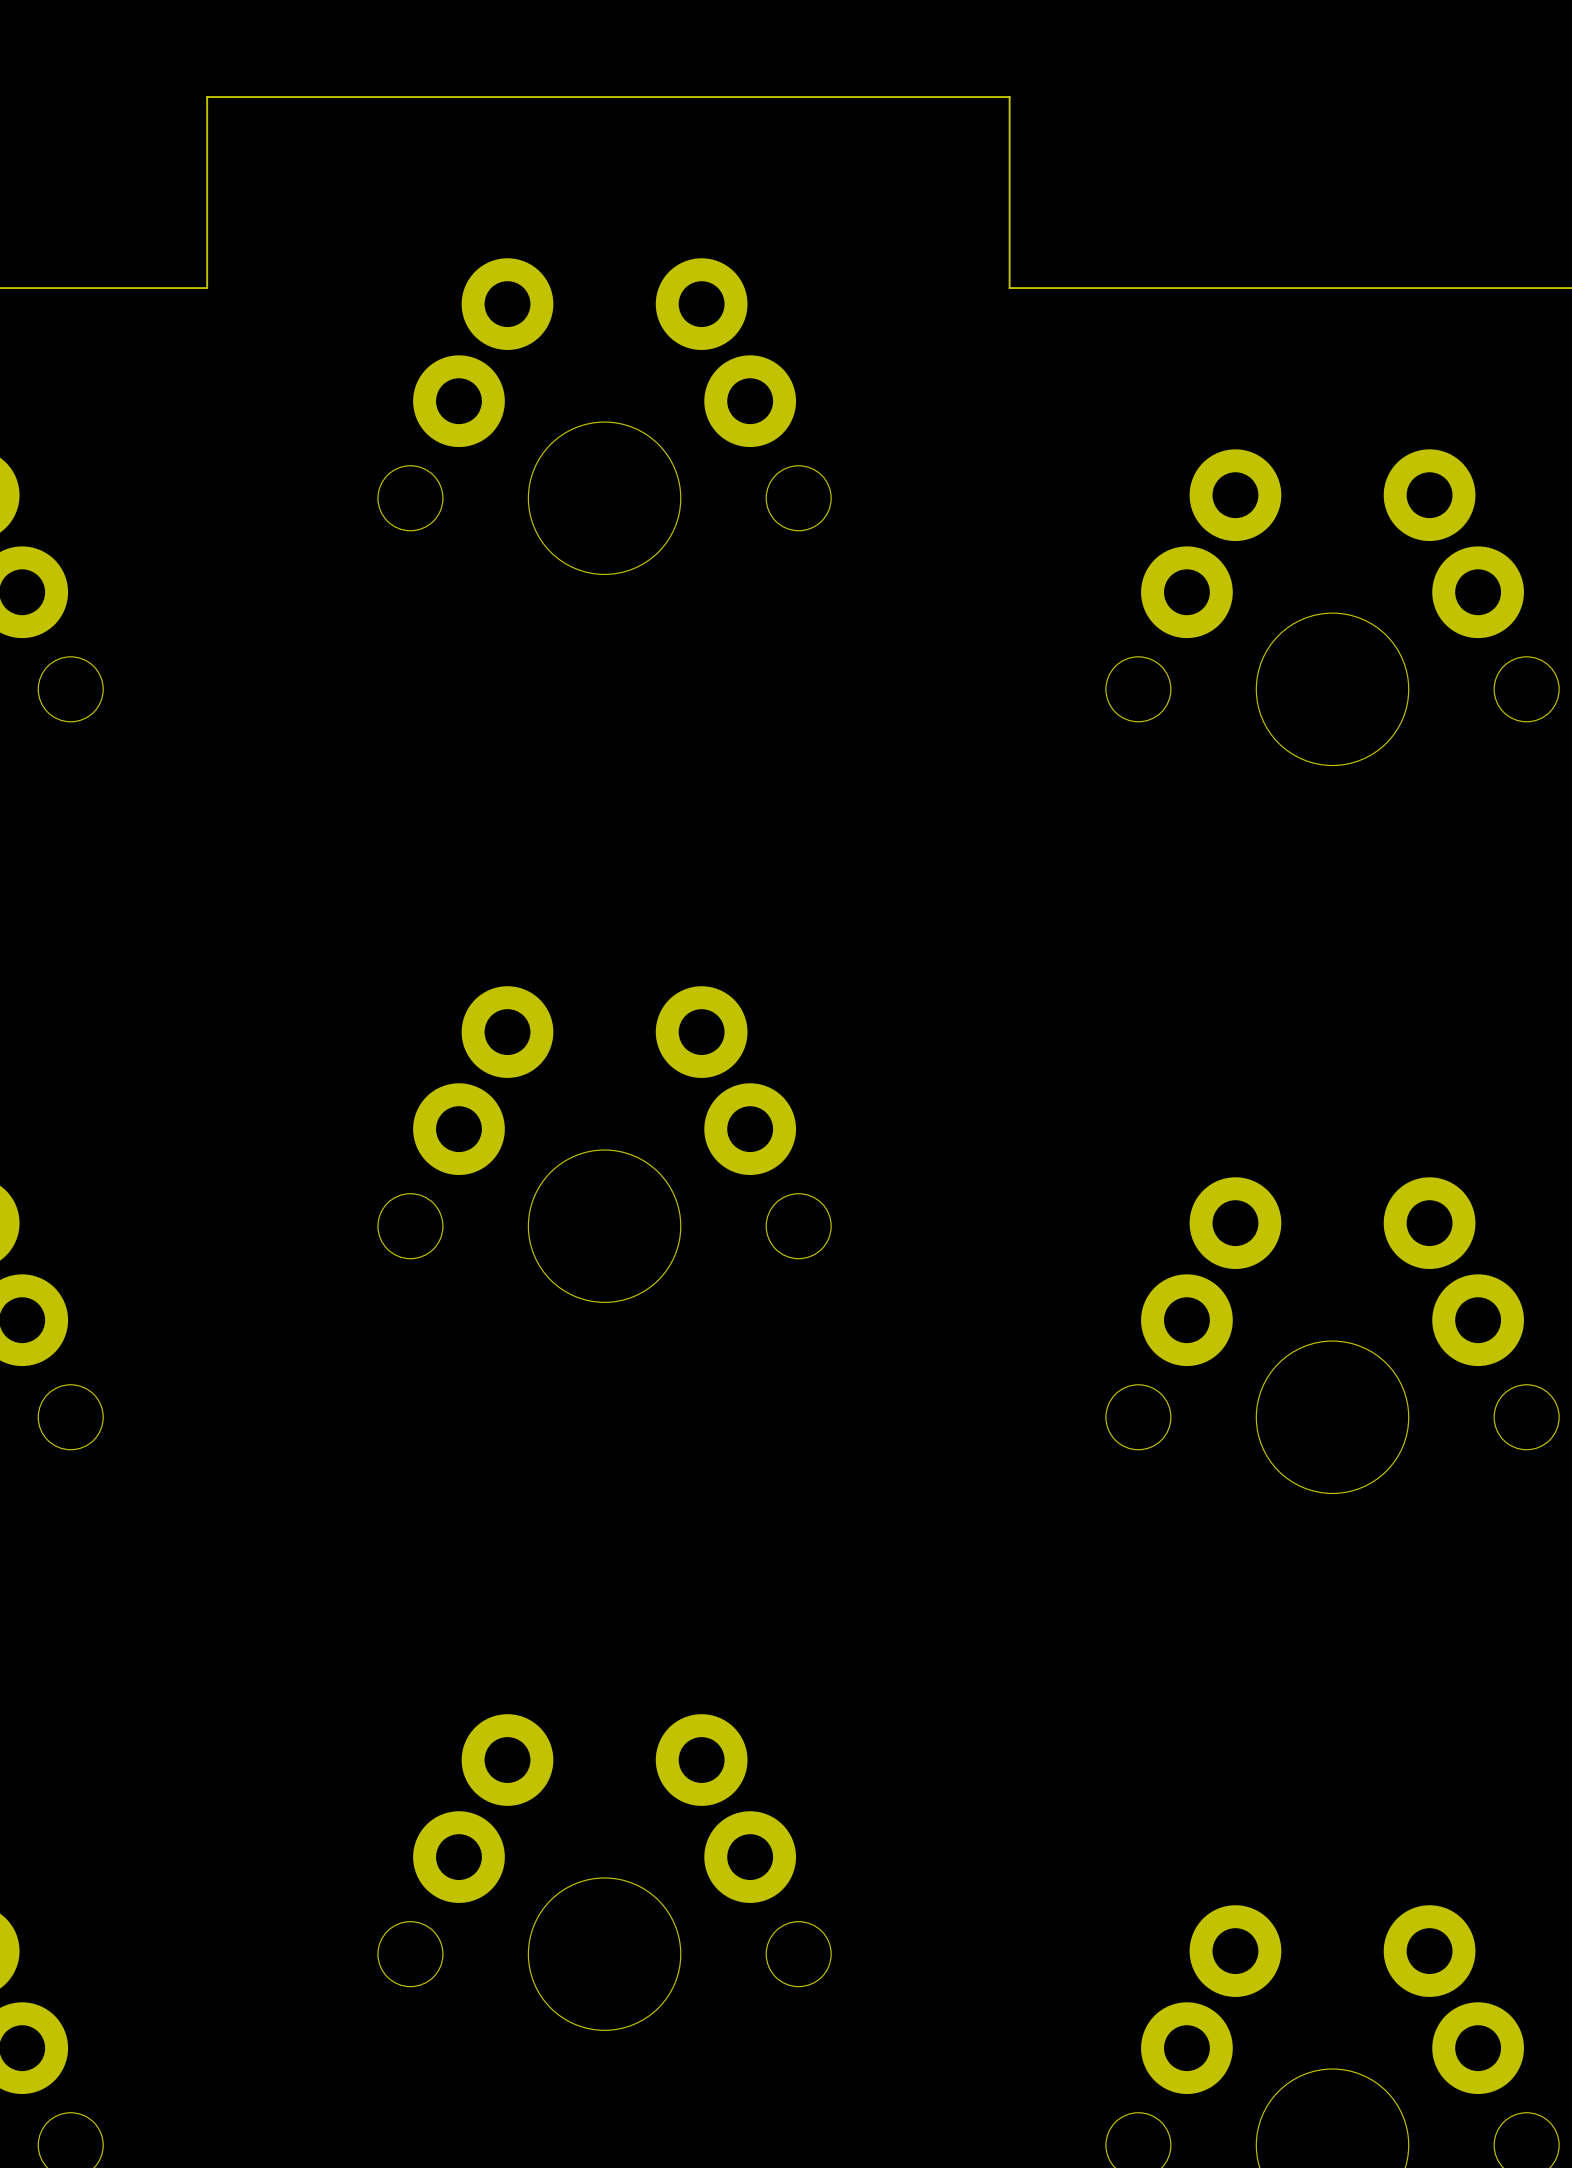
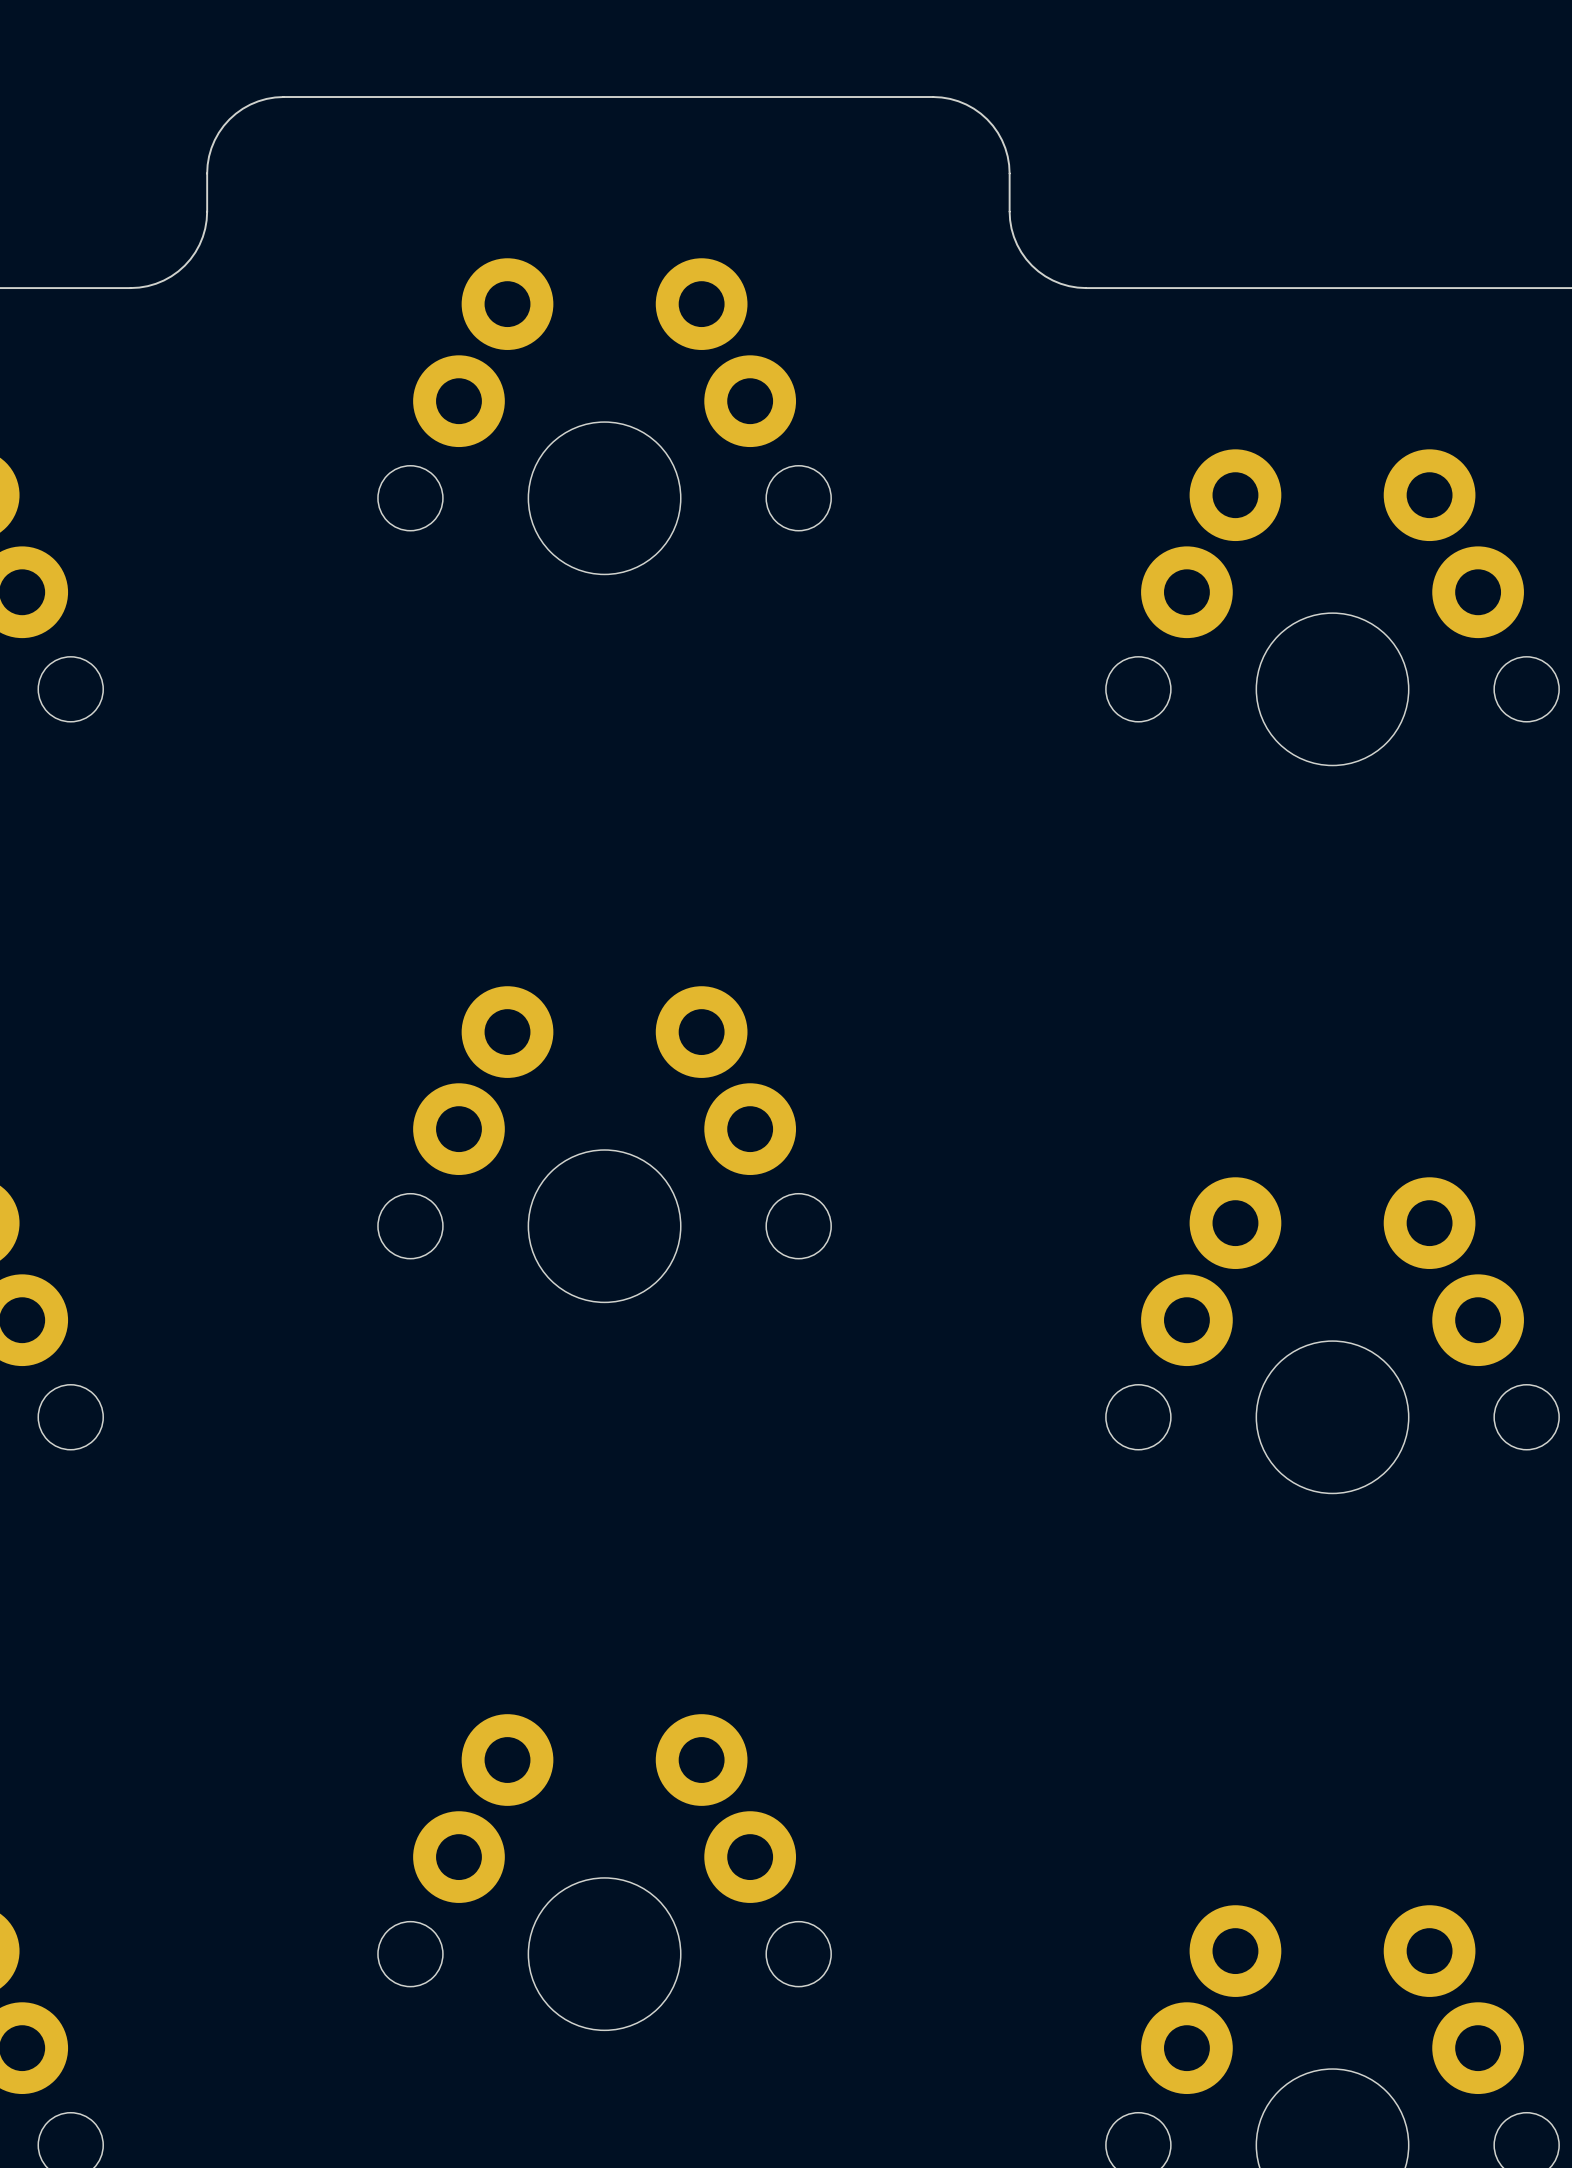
board edge: (283, 97) (207, 97) (207, 173) -> (283, 97) (258, 101) (242, 108) (229, 119) (218, 132) (211, 148) (207, 173)
board edge: (933, 97) (1009, 97) (1009, 173) -> (933, 97) (950, 98) (966, 104) (987, 119) (997, 132) (1005, 148) (1009, 173)
board edge: (207, 211) (207, 288) (130, 288) -> (207, 211) (202, 236) (195, 252) (184, 265) (163, 280) (147, 286) (130, 288)
board edge: (1009, 211) (1009, 288) (1086, 288) -> (1009, 211) (1013, 236) (1021, 252) (1032, 265) (1052, 280) (1069, 286) (1086, 288)

